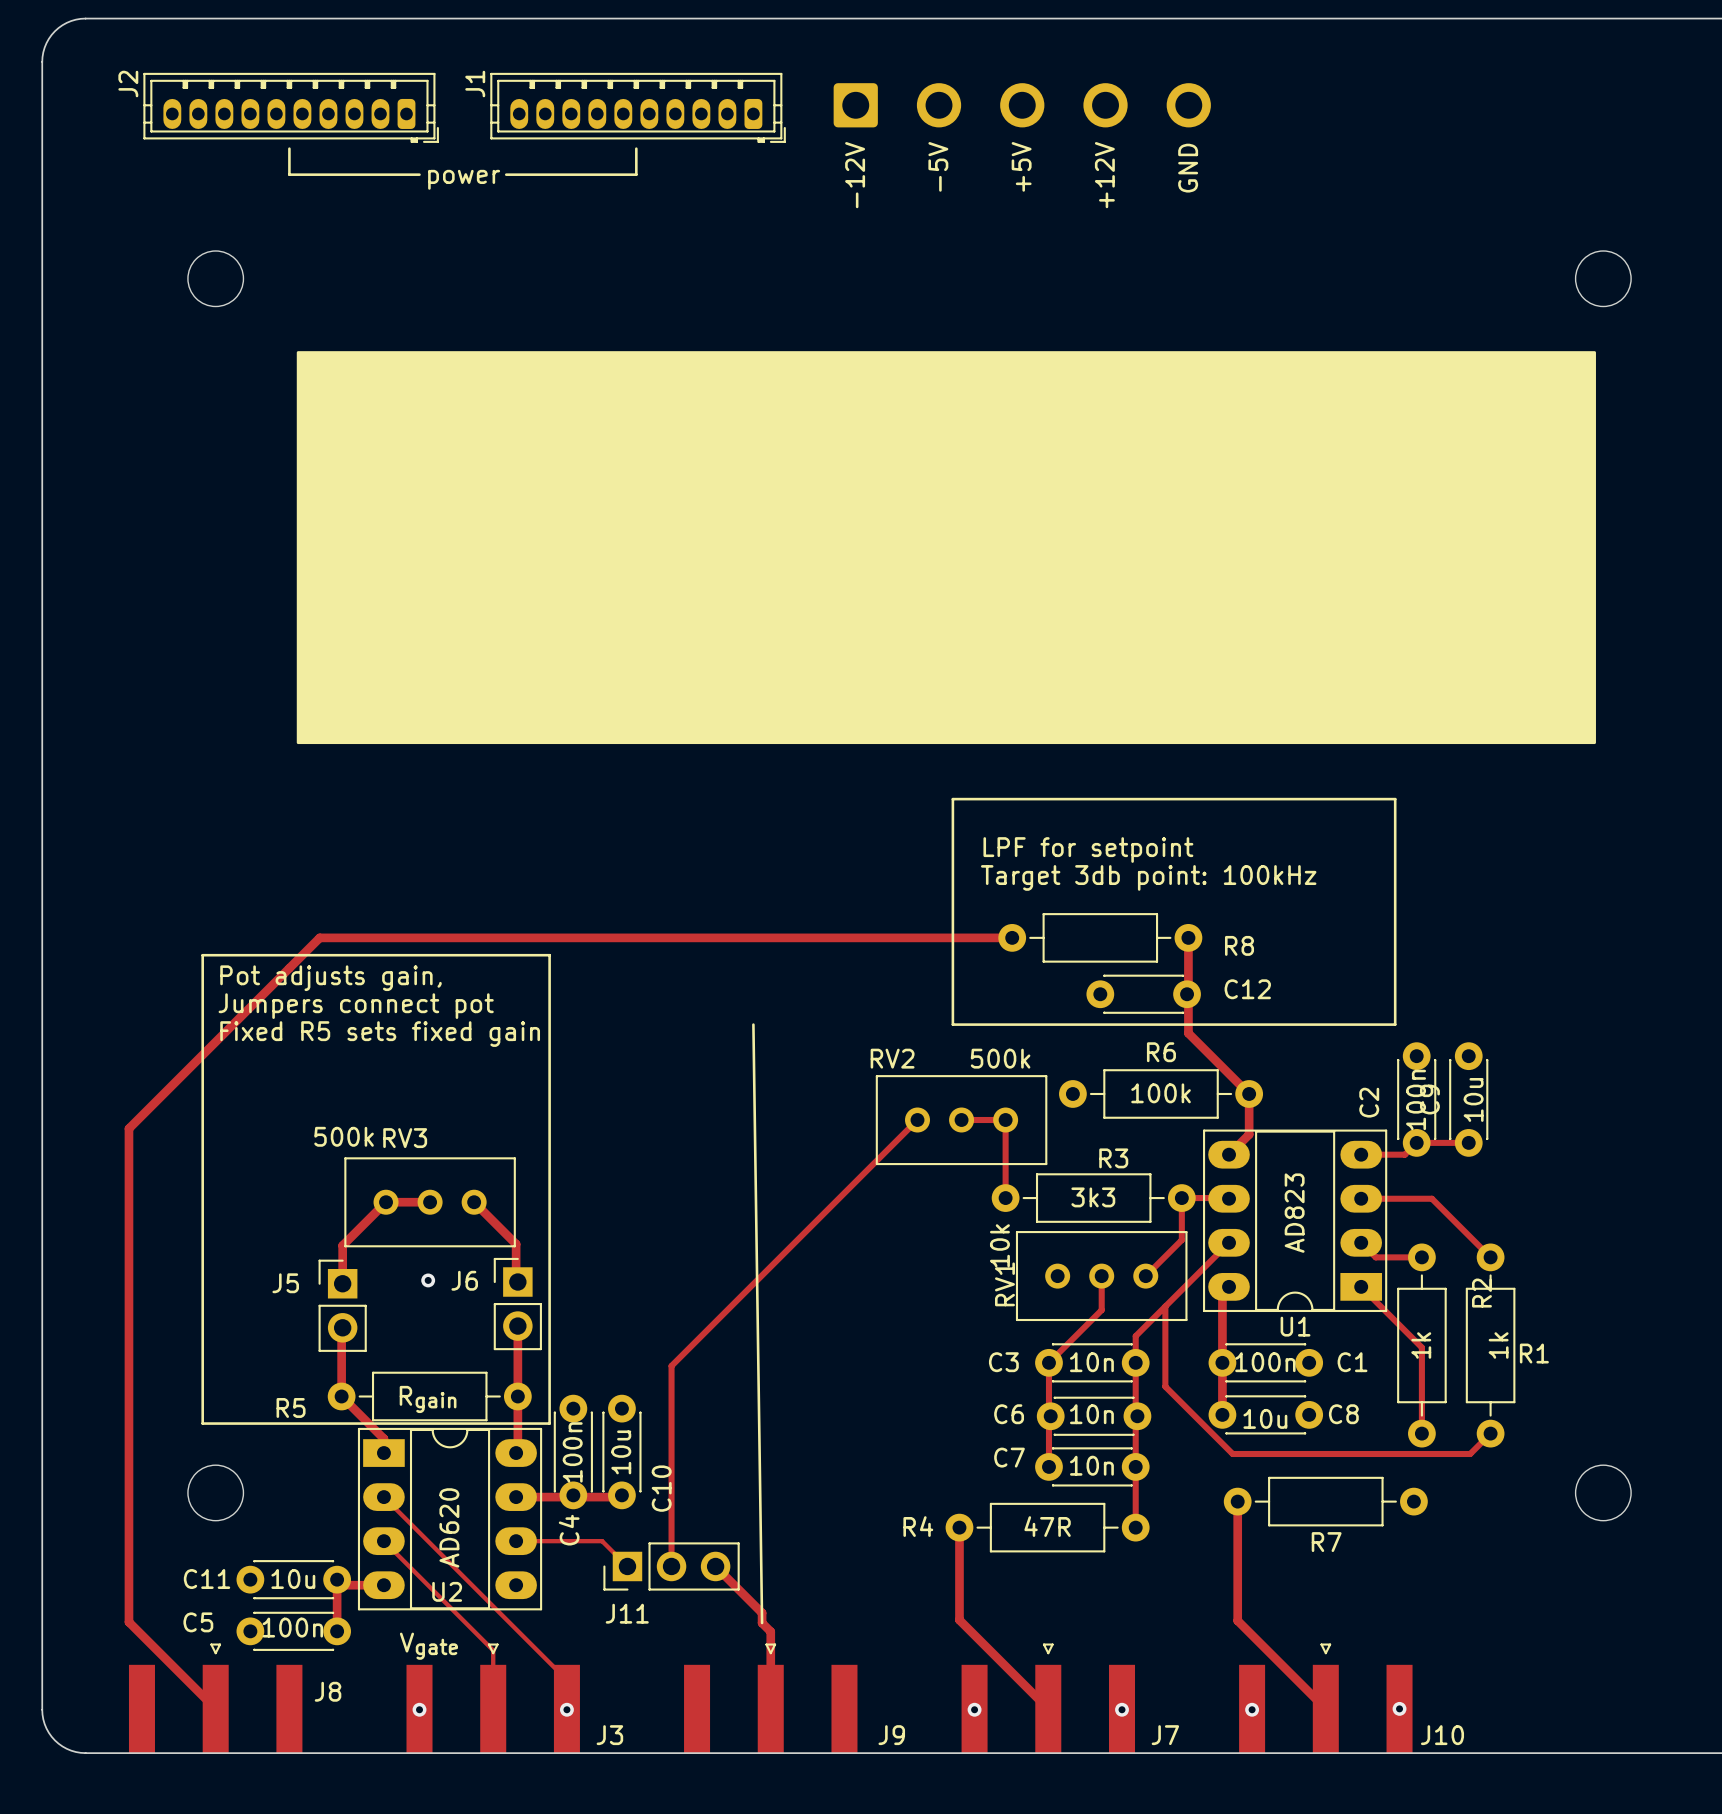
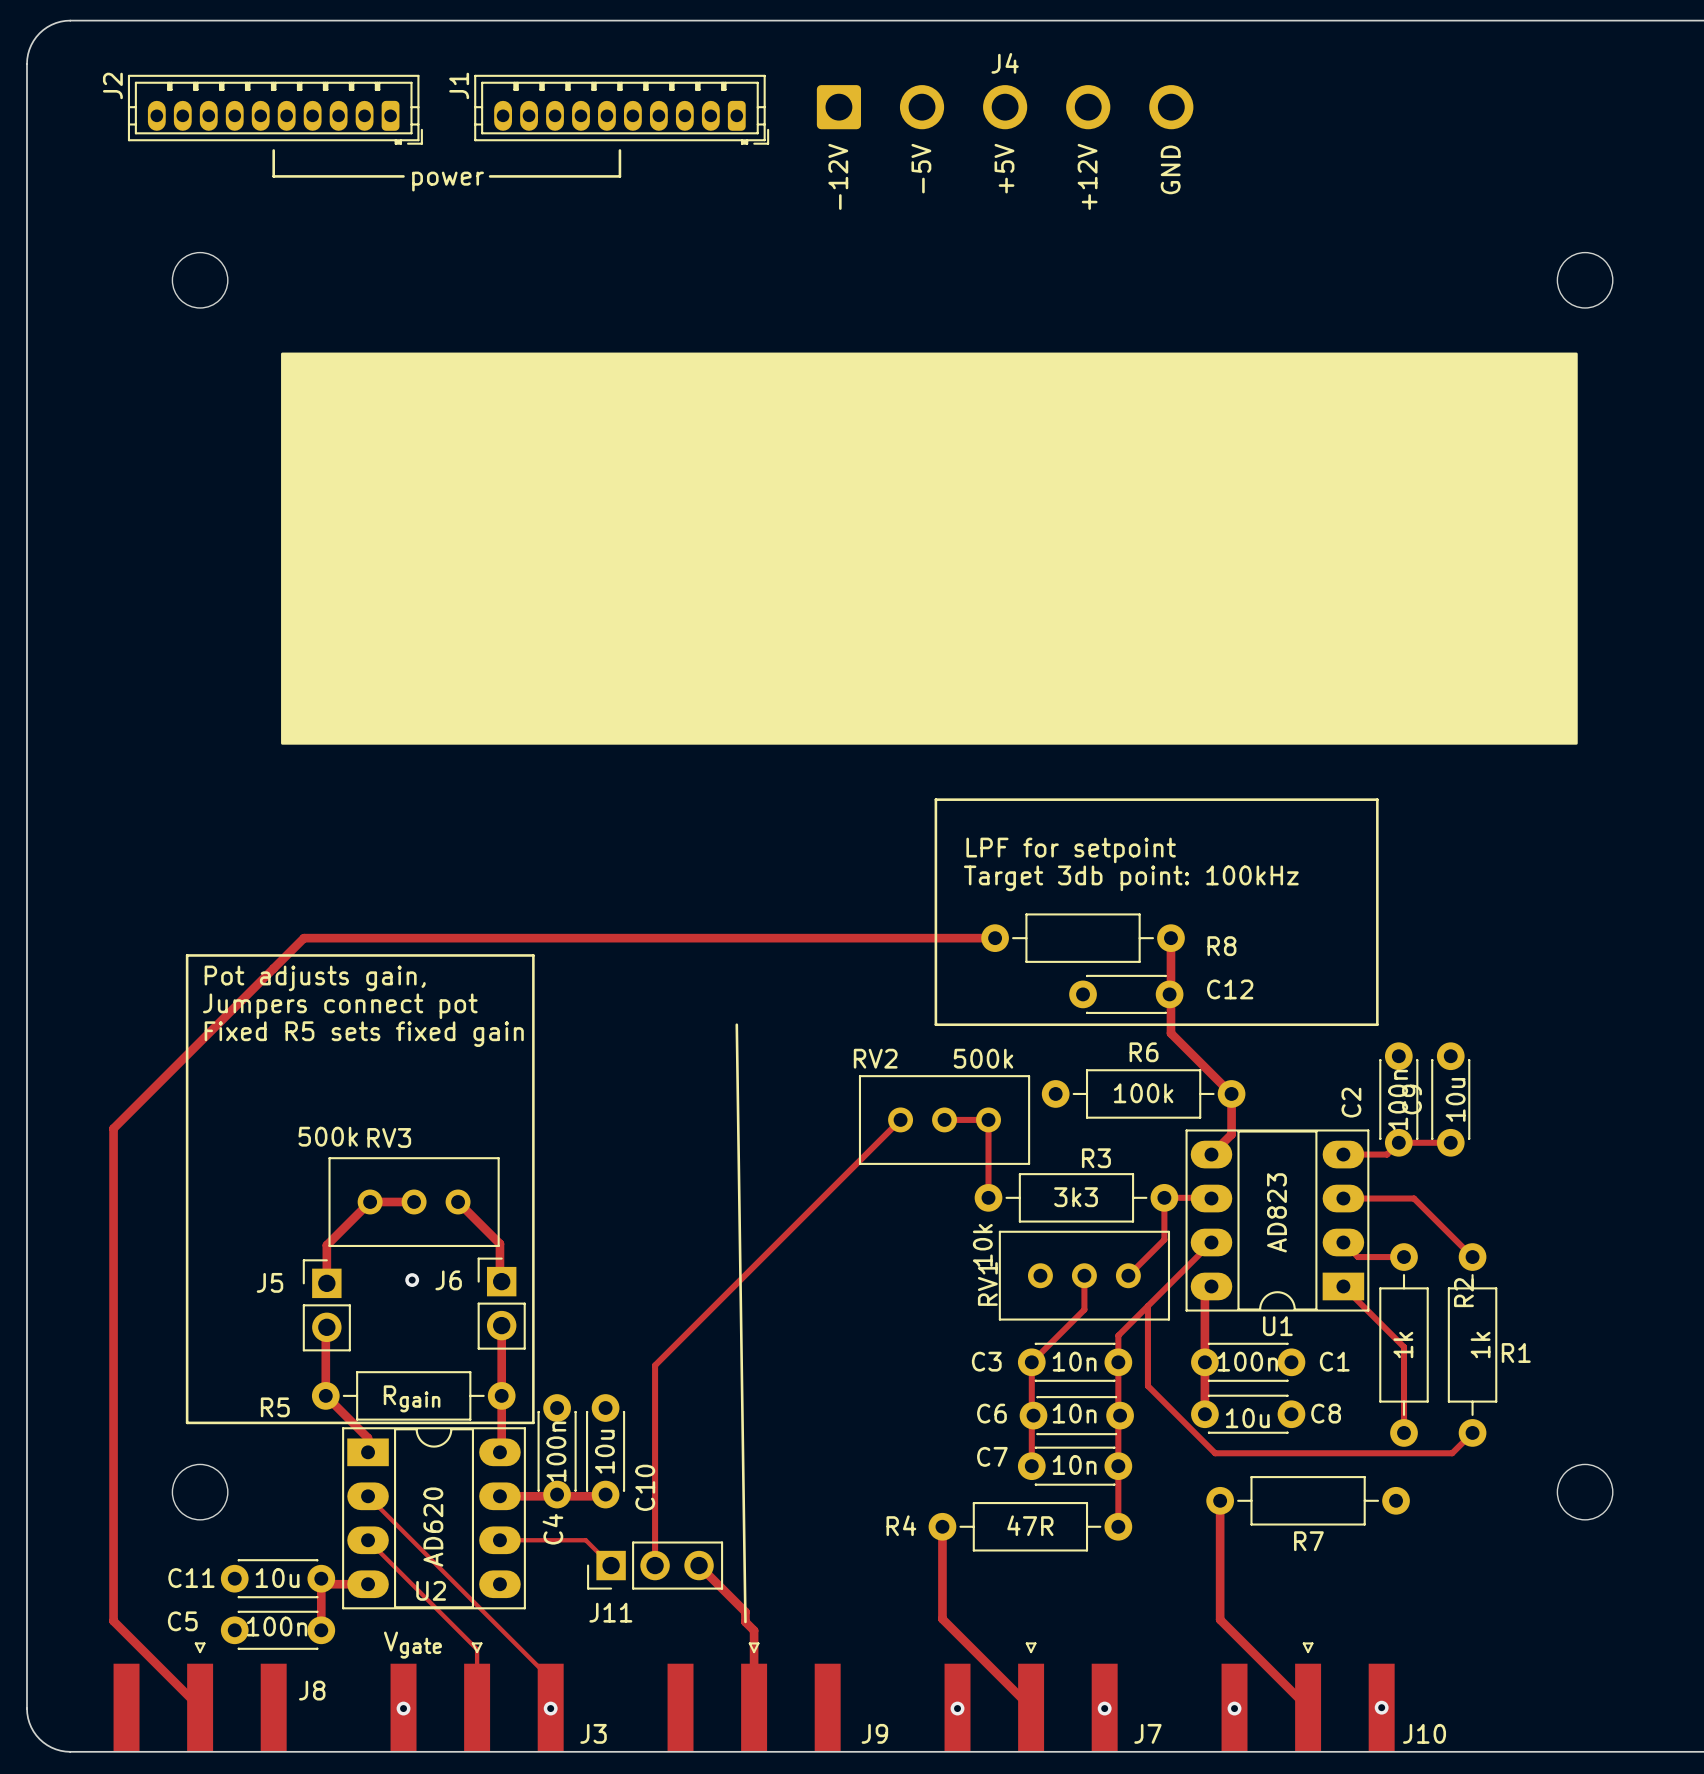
J4 name: none -> J4 (1005, 63)

